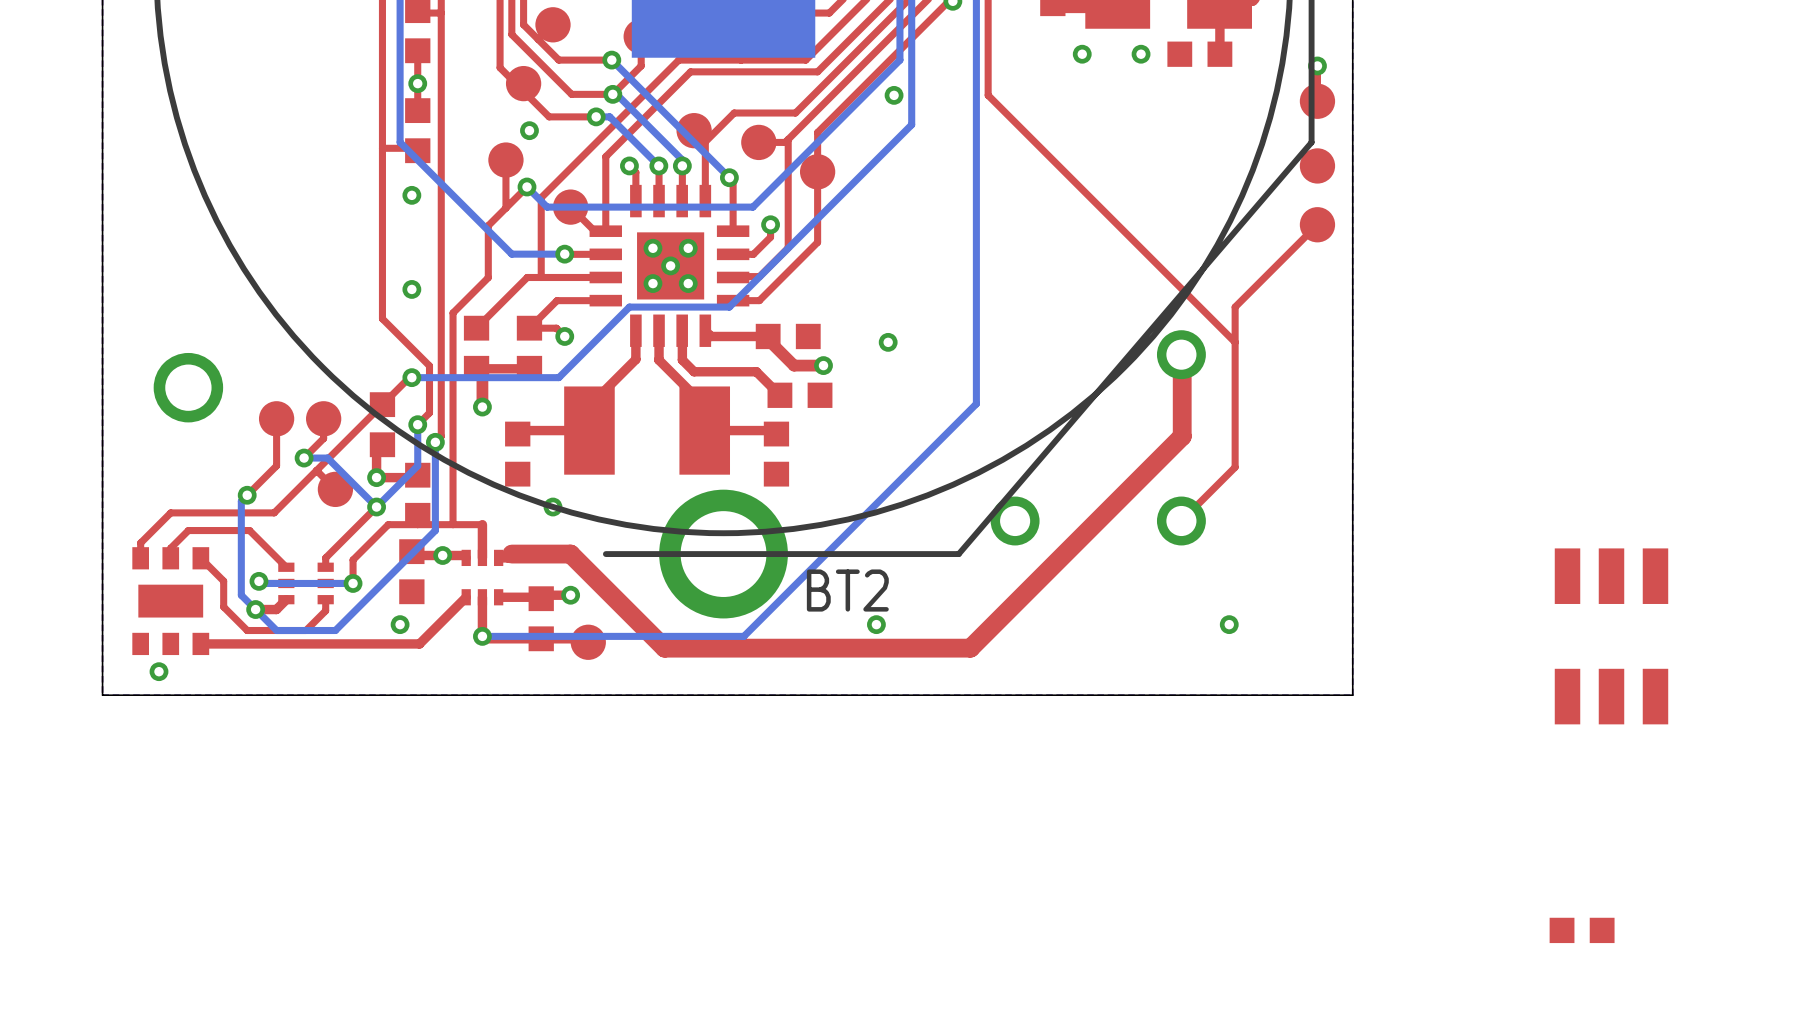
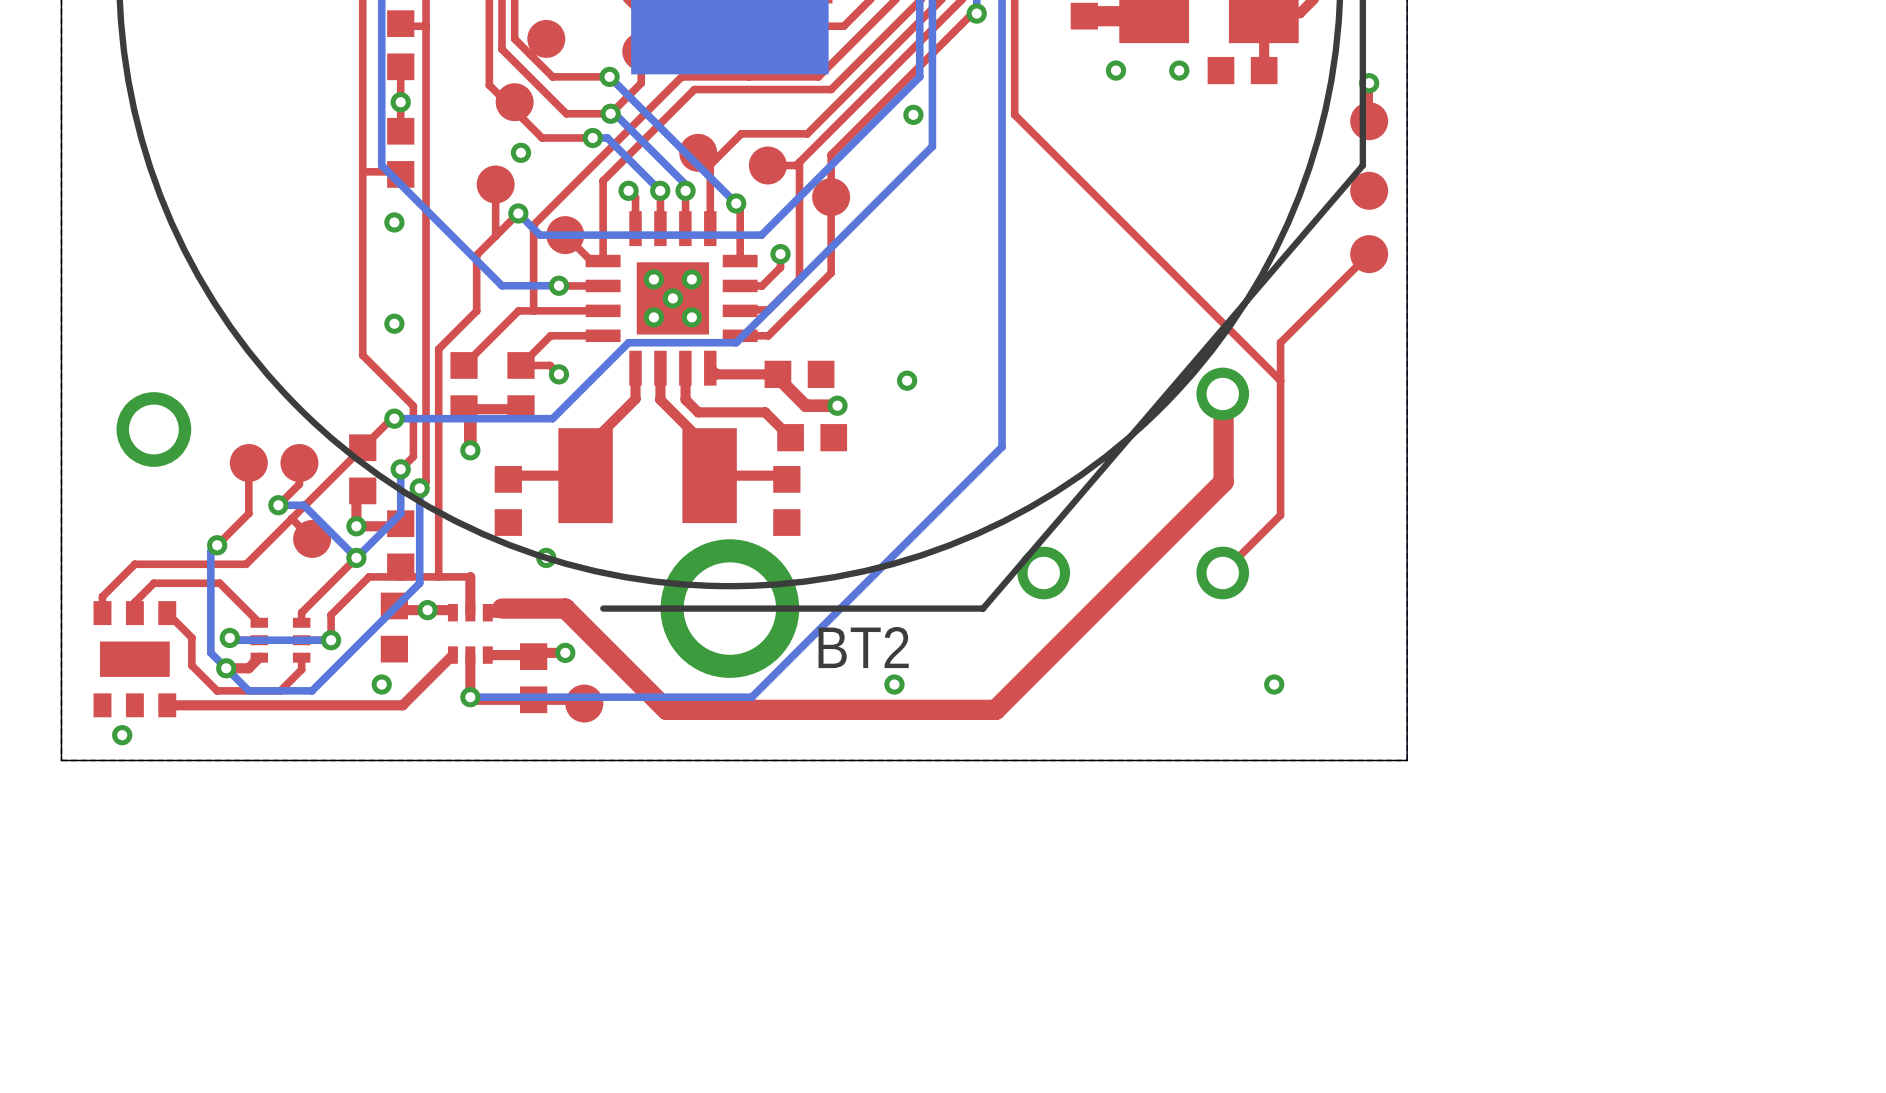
part: (1611, 636) -> none
part: (1582, 930) -> none

